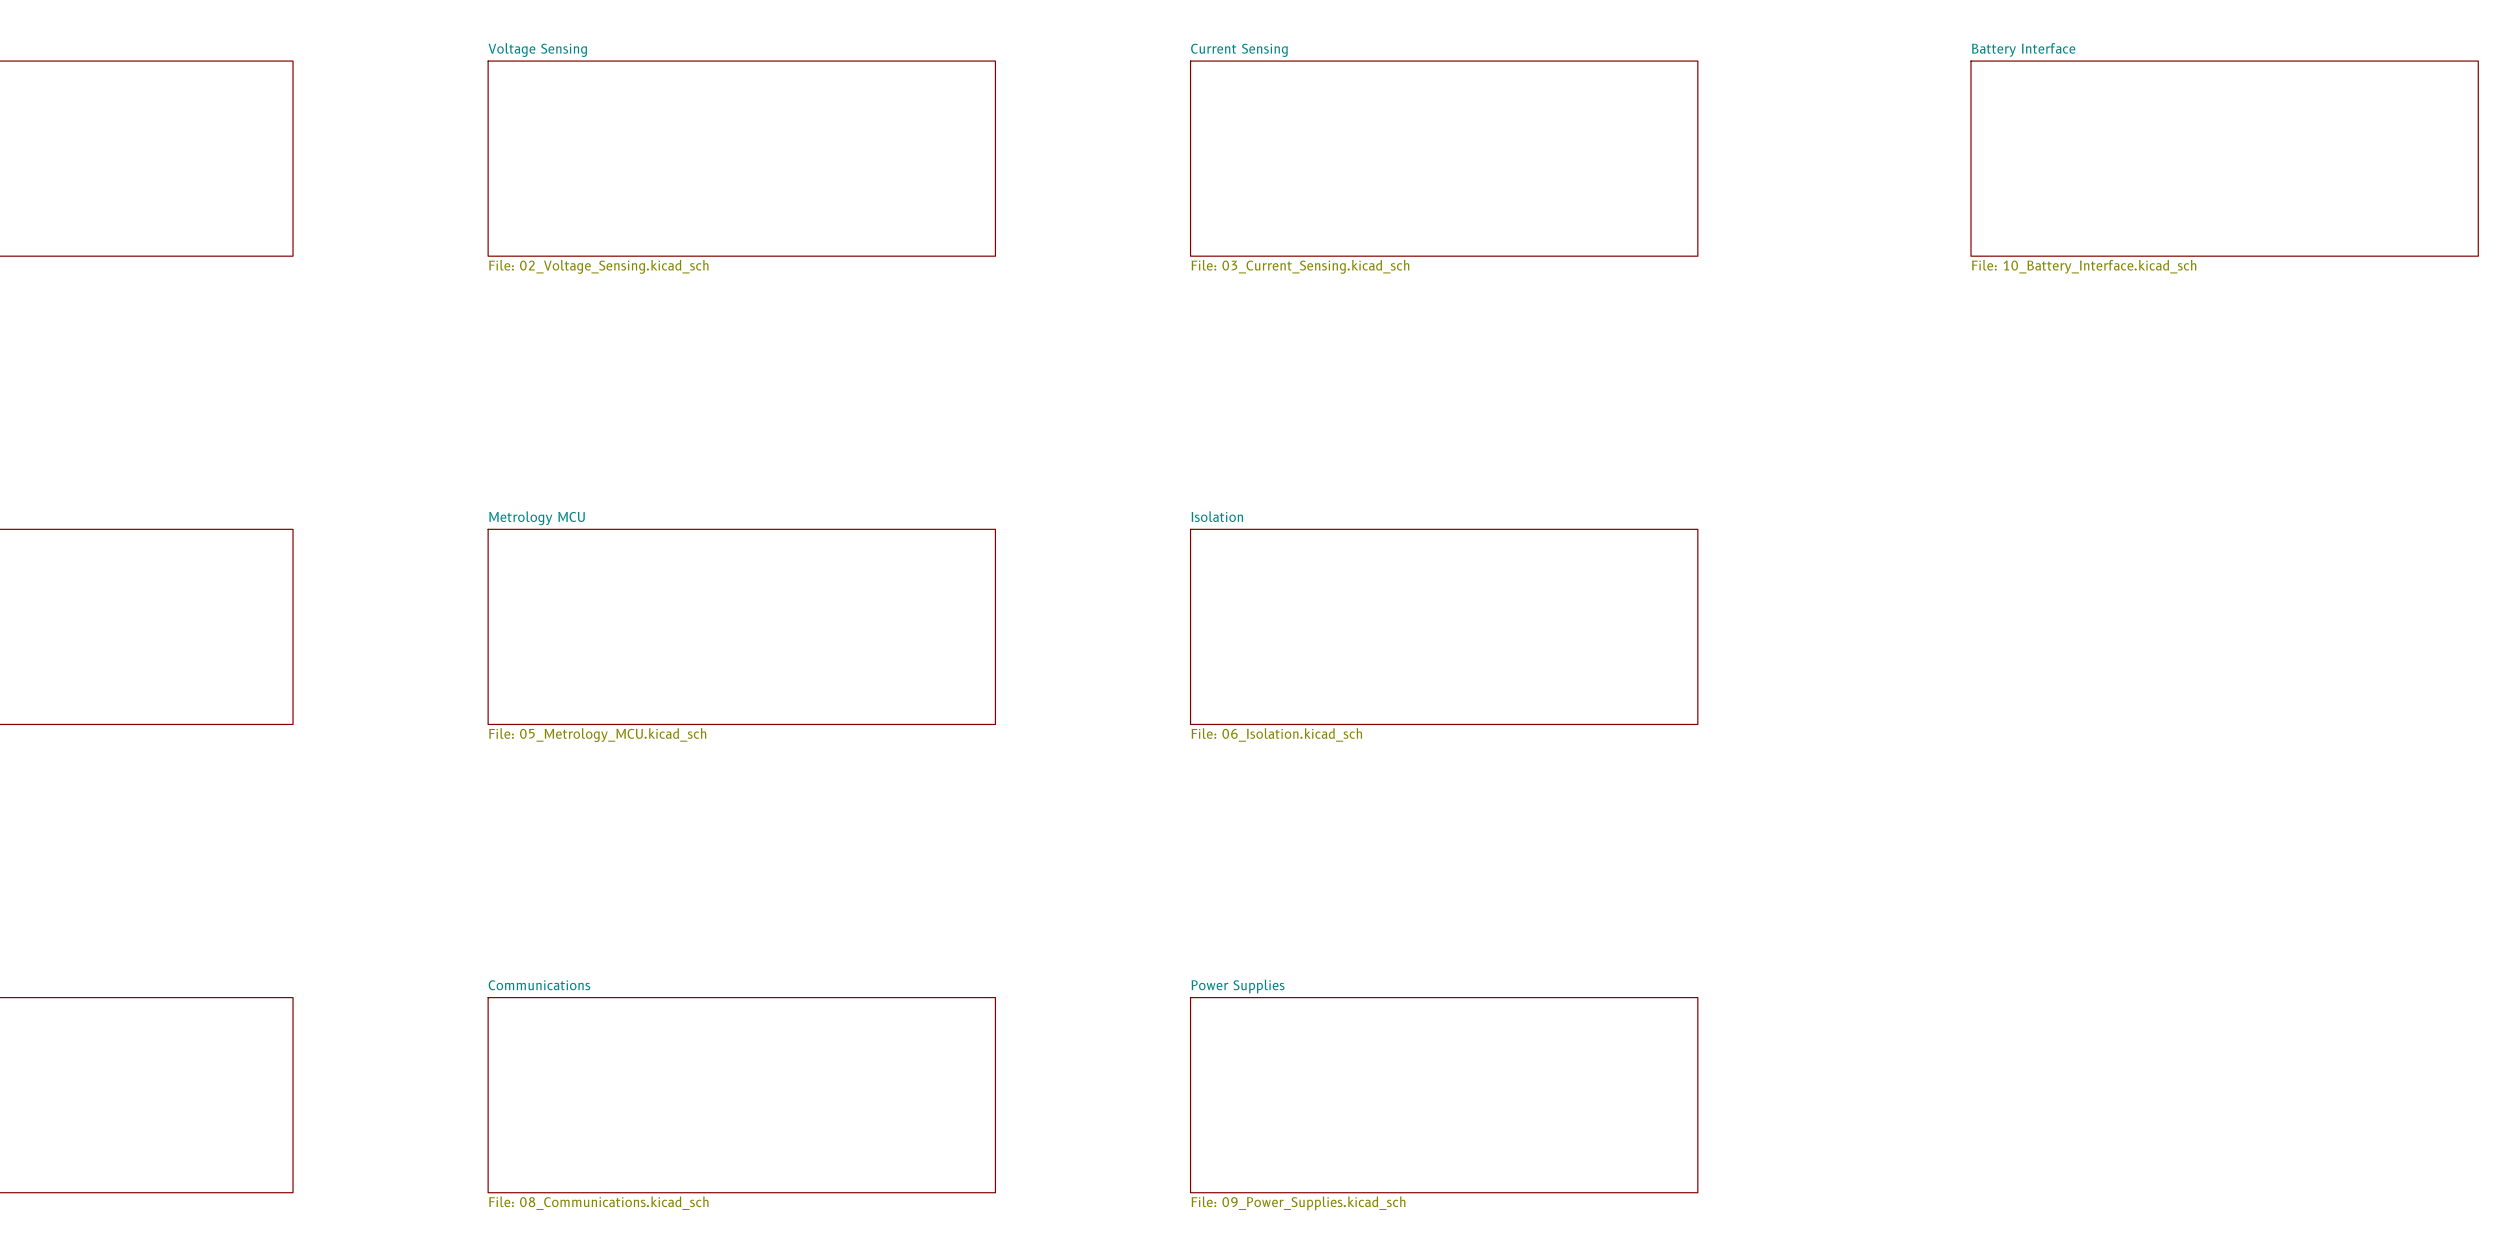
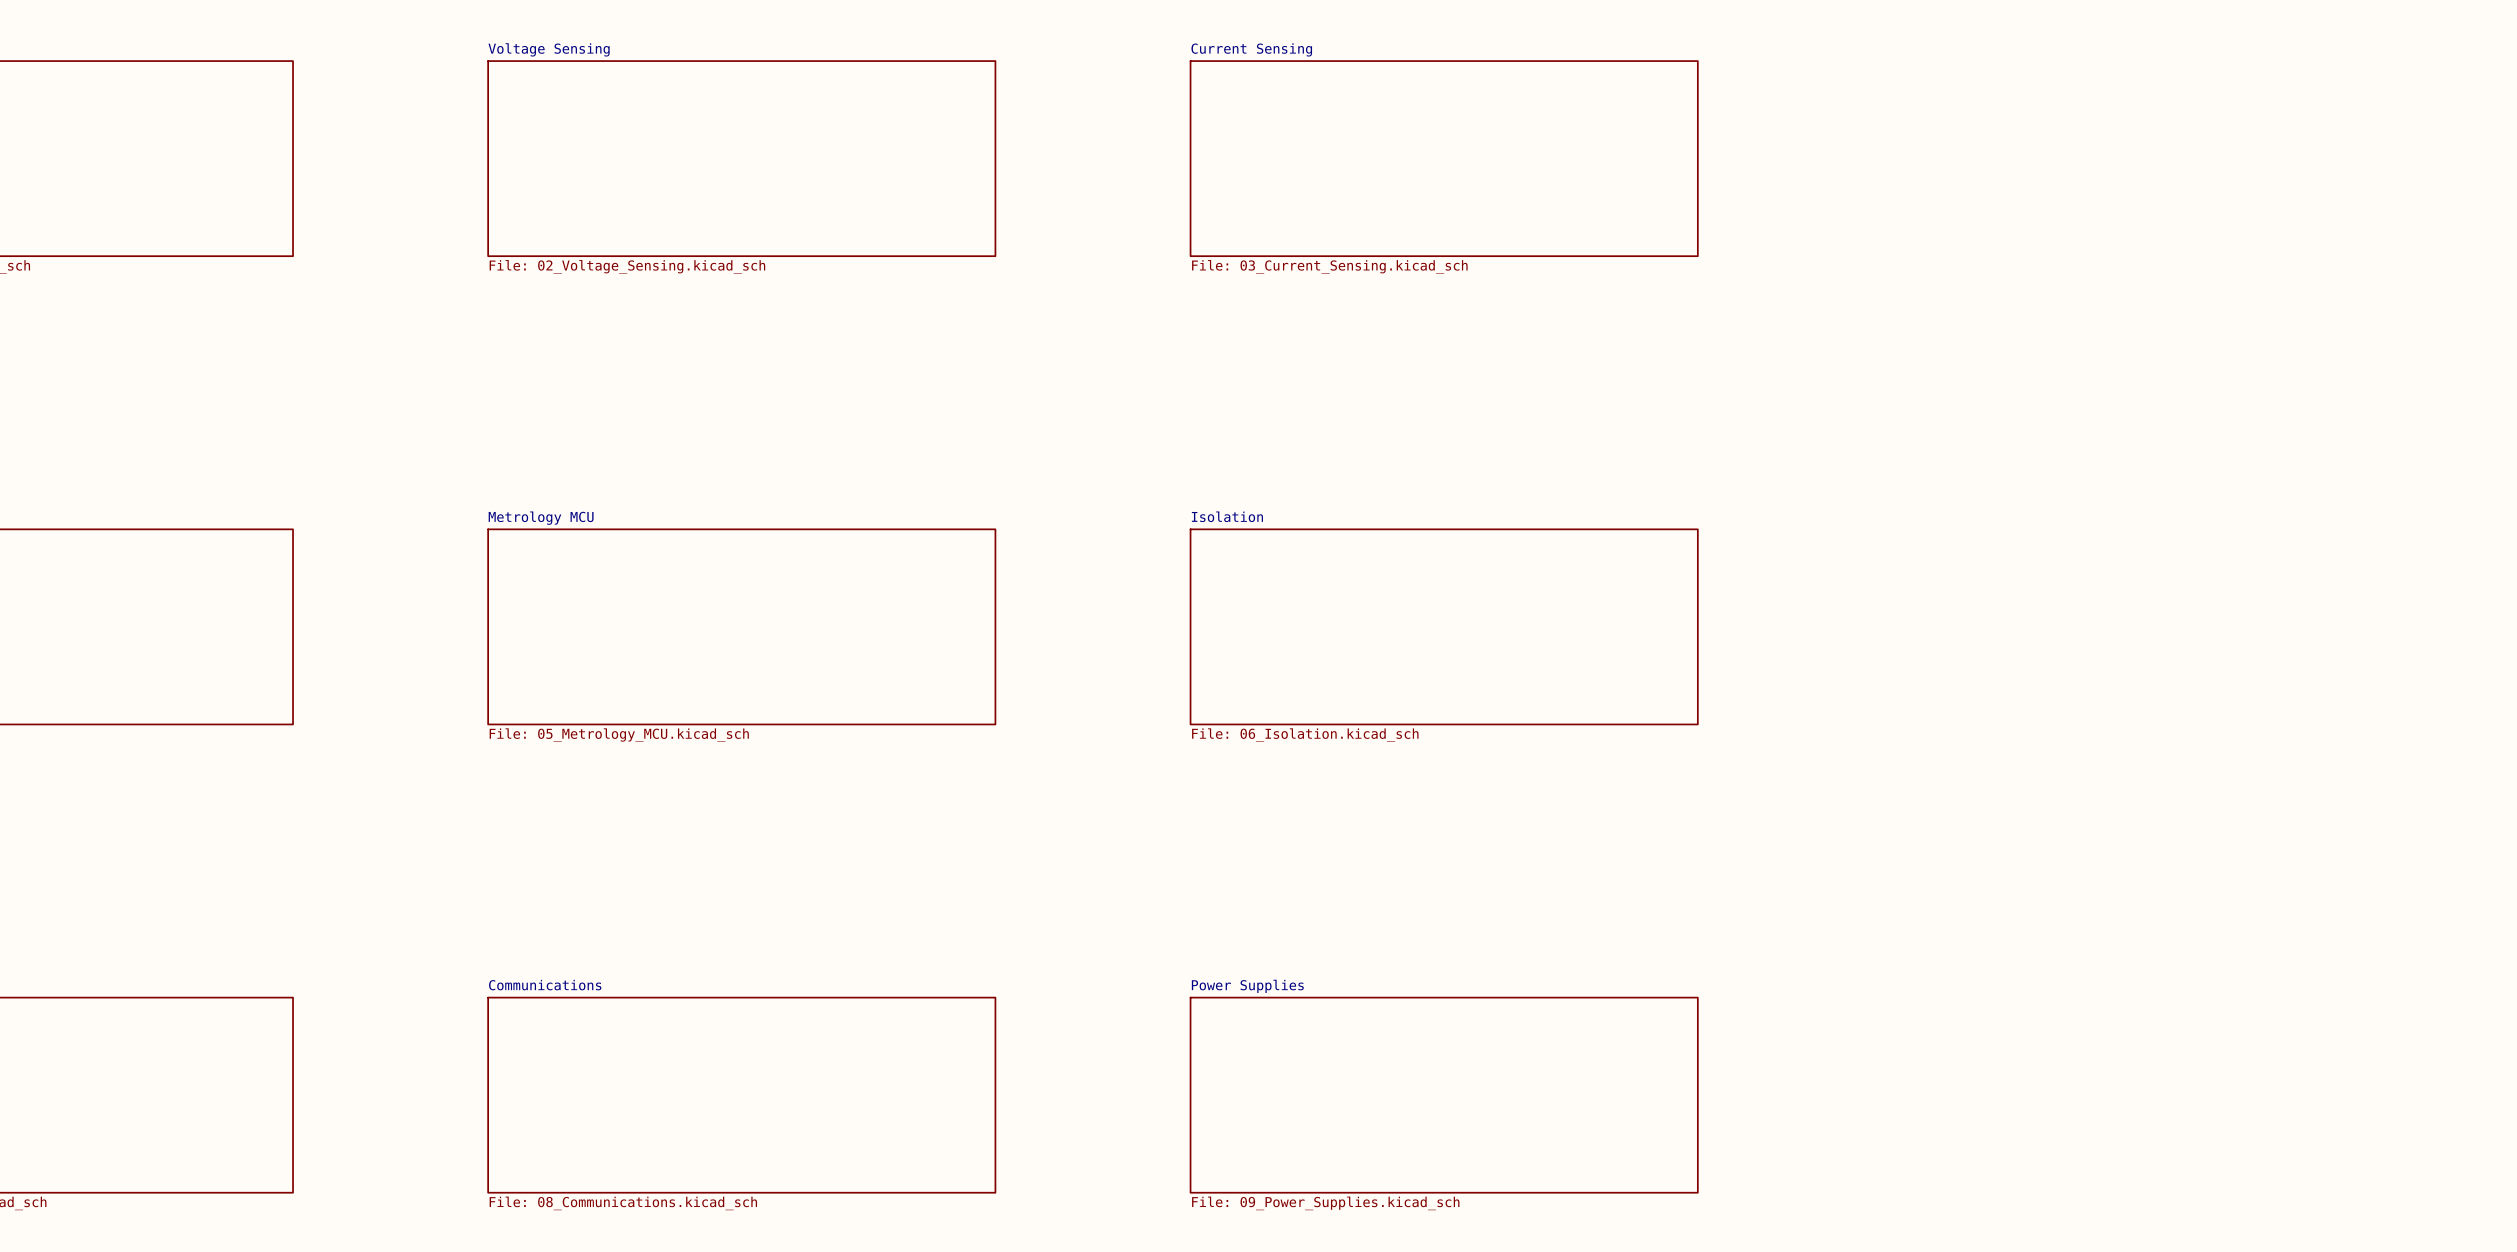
sheet Battery Interface: File: 10_Battery_Interface.kicad_sch (2224, 158) -> none

